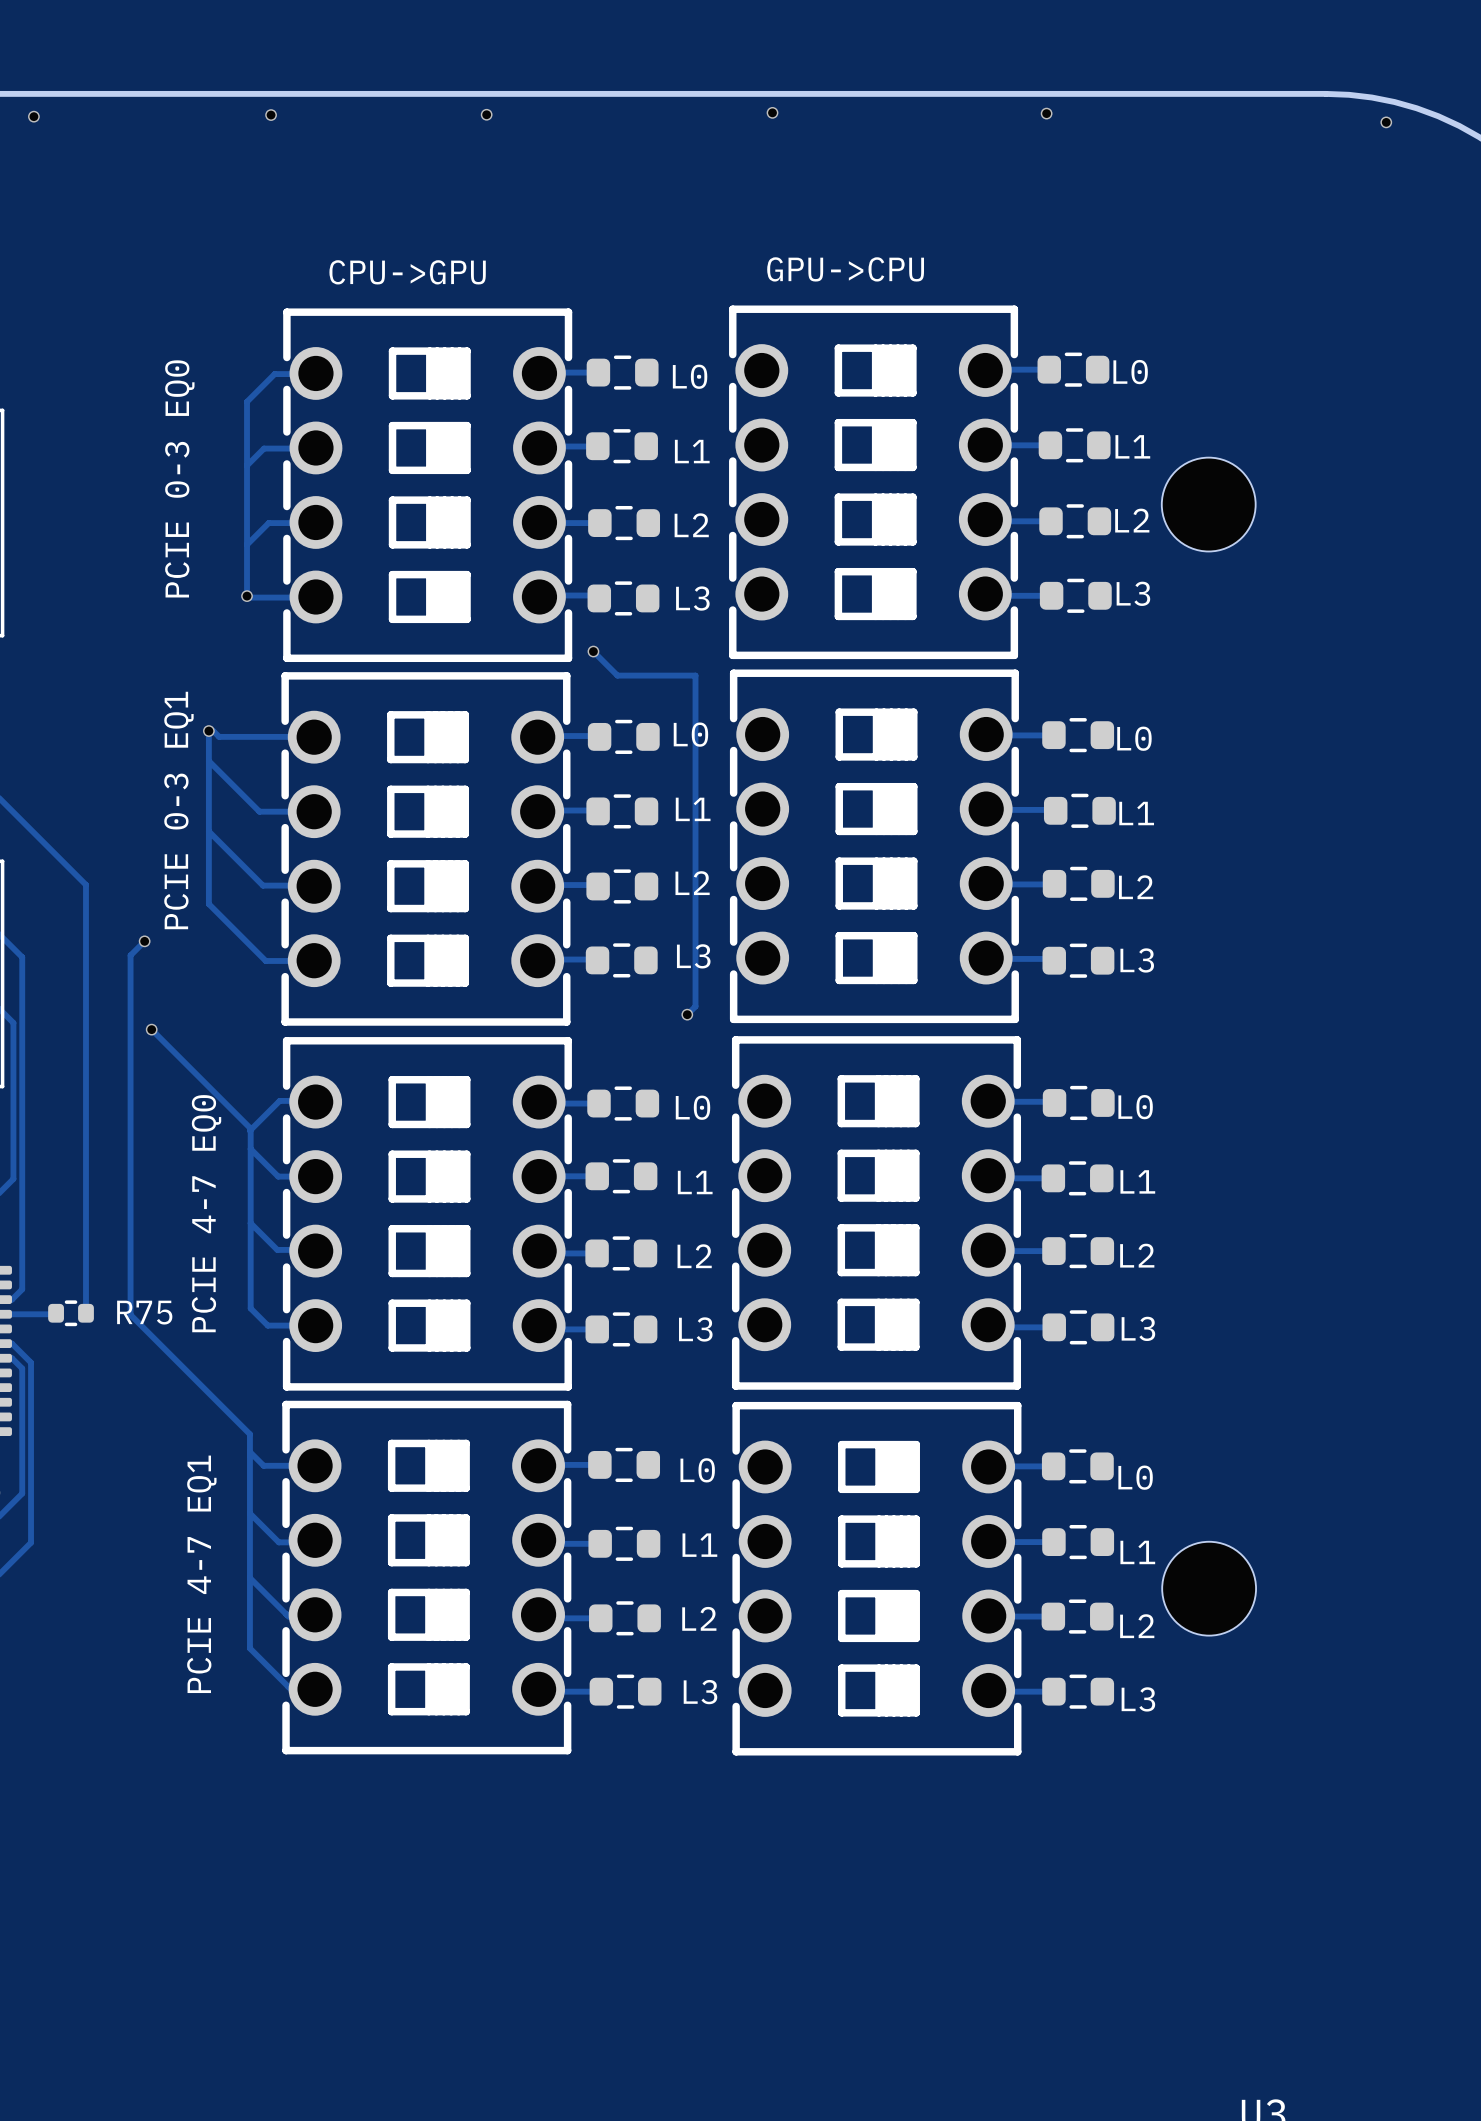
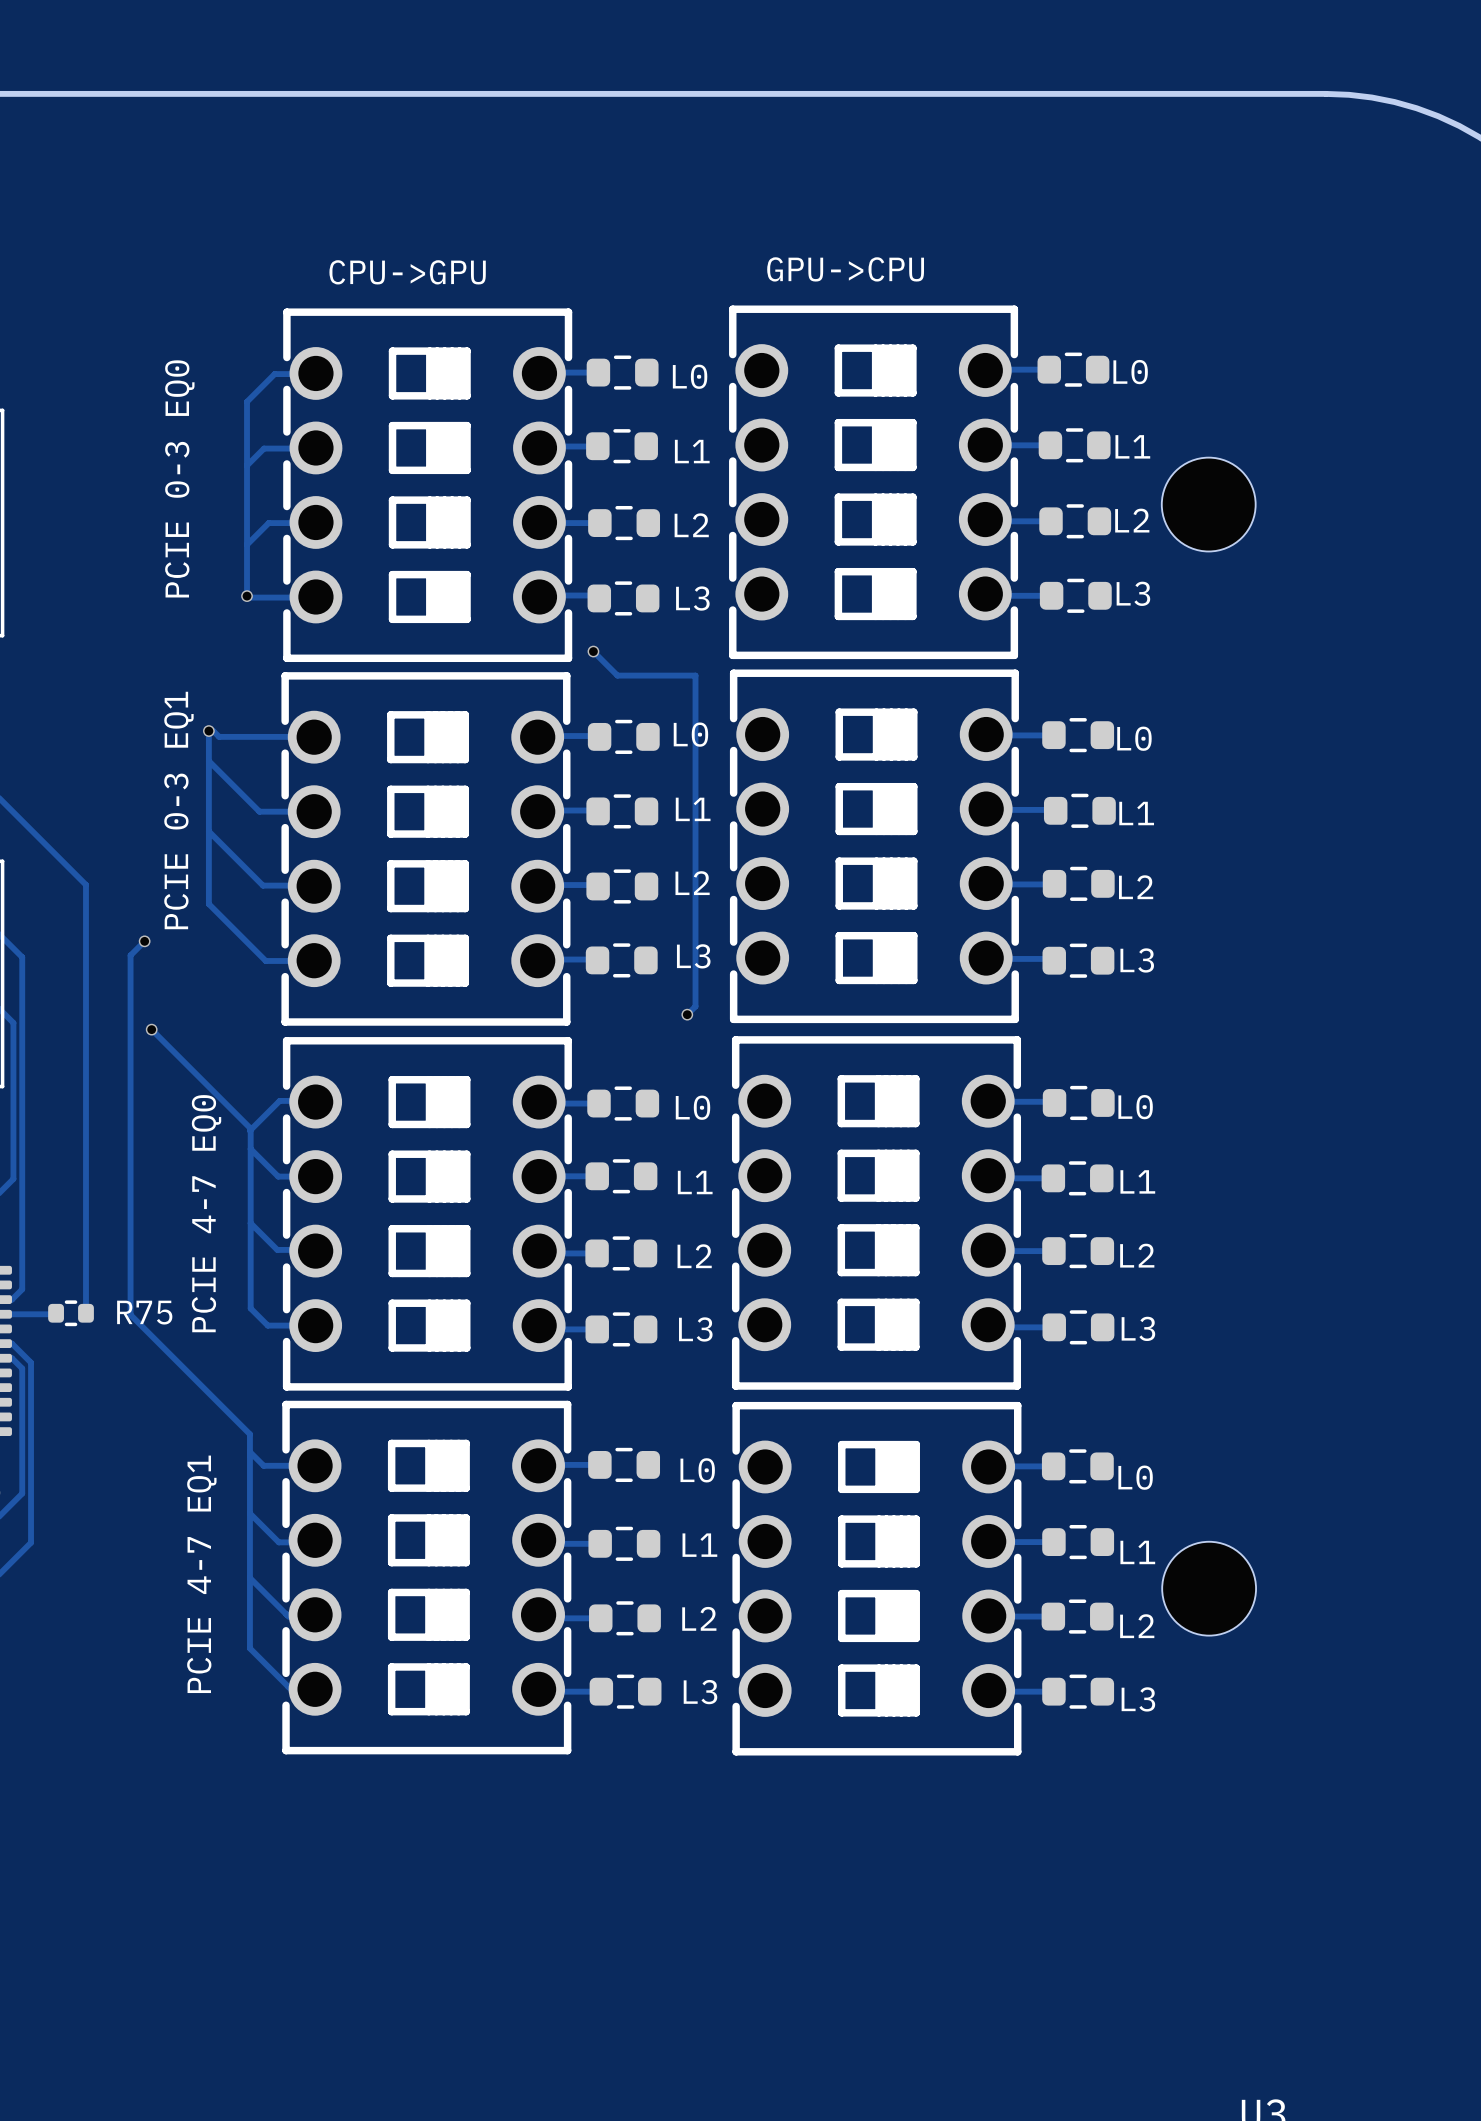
via: (772, 112) -> none
via: (1046, 113) -> none
via: (486, 114) -> none
via: (271, 115) -> none
via: (33, 116) -> none
via: (1386, 122) -> none

